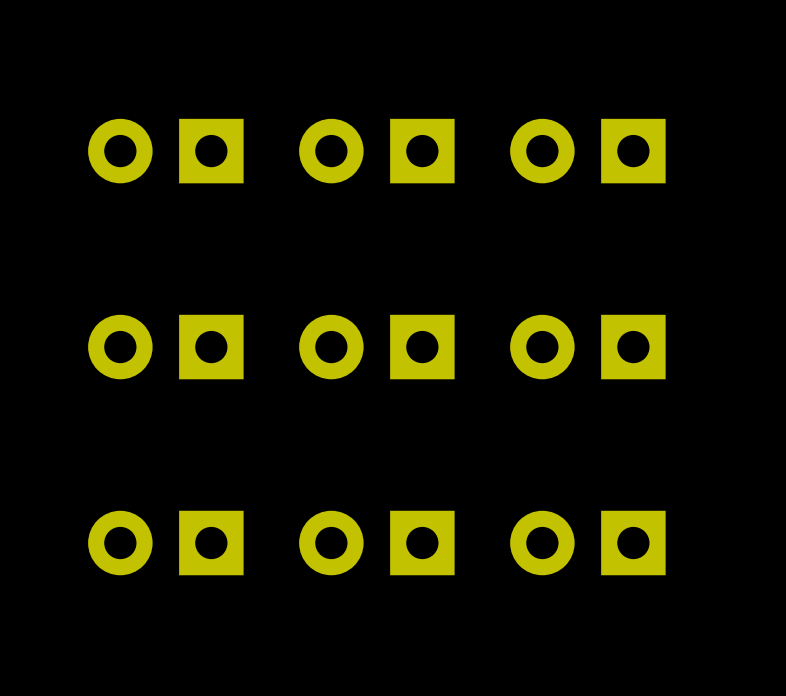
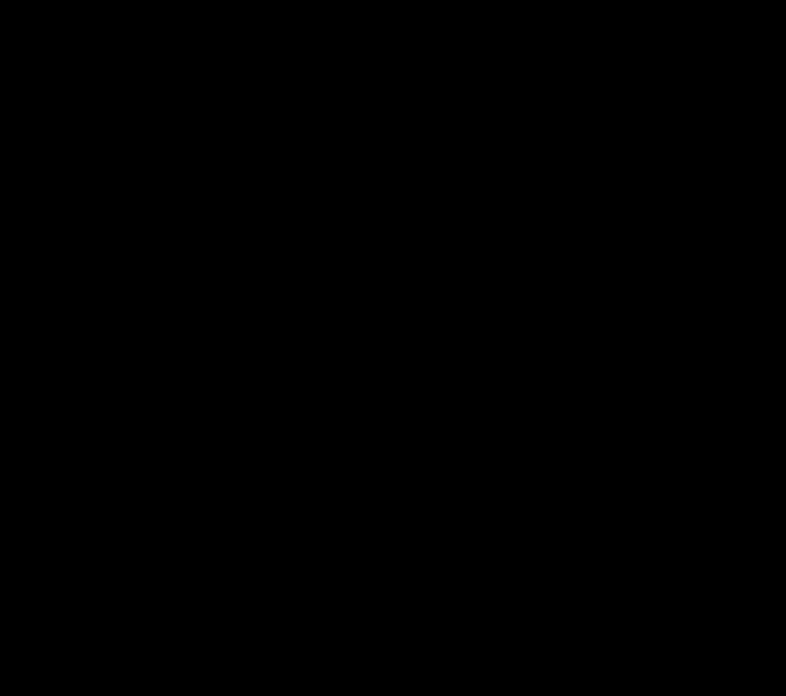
part: (165, 151) -> none
part: (376, 151) -> none
part: (587, 151) -> none
part: (165, 347) -> none
part: (376, 347) -> none
part: (587, 347) -> none
part: (165, 543) -> none
part: (376, 543) -> none
part: (587, 543) -> none

